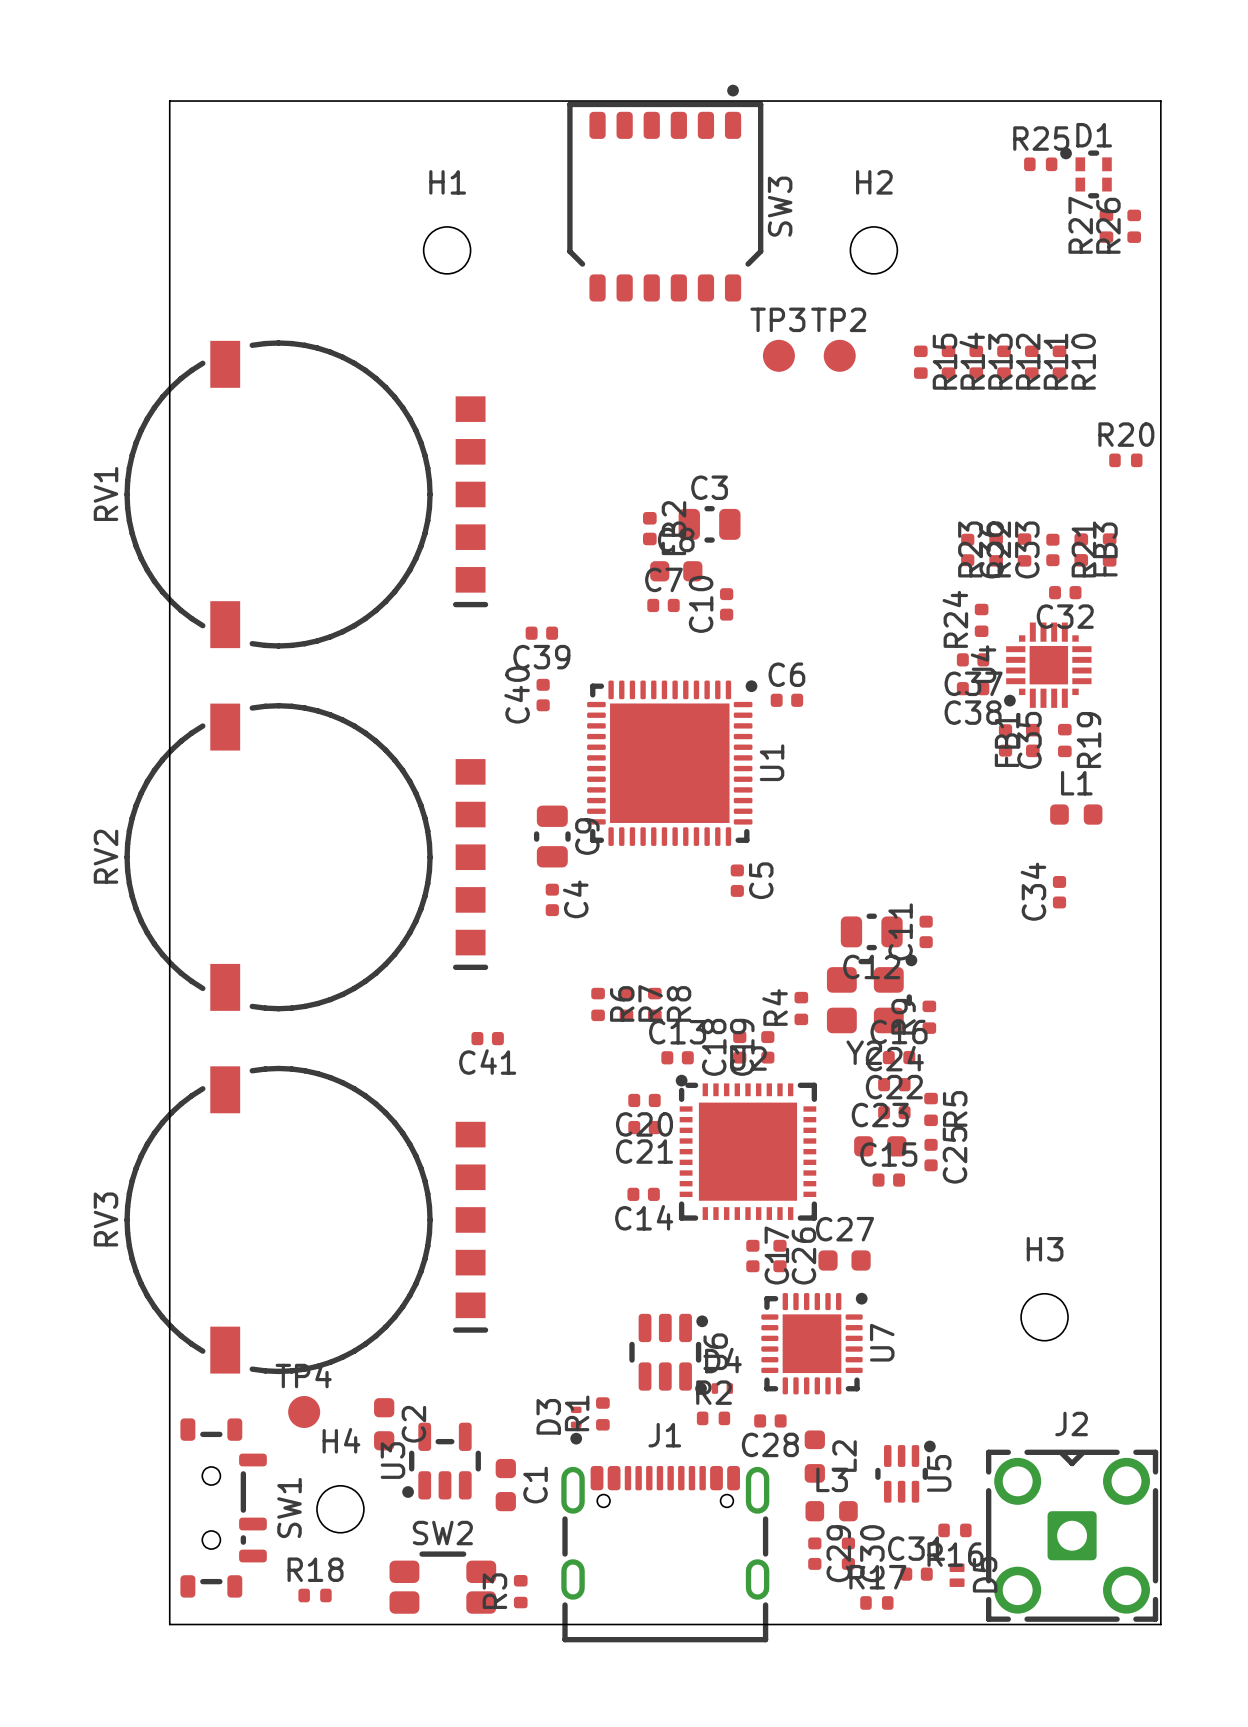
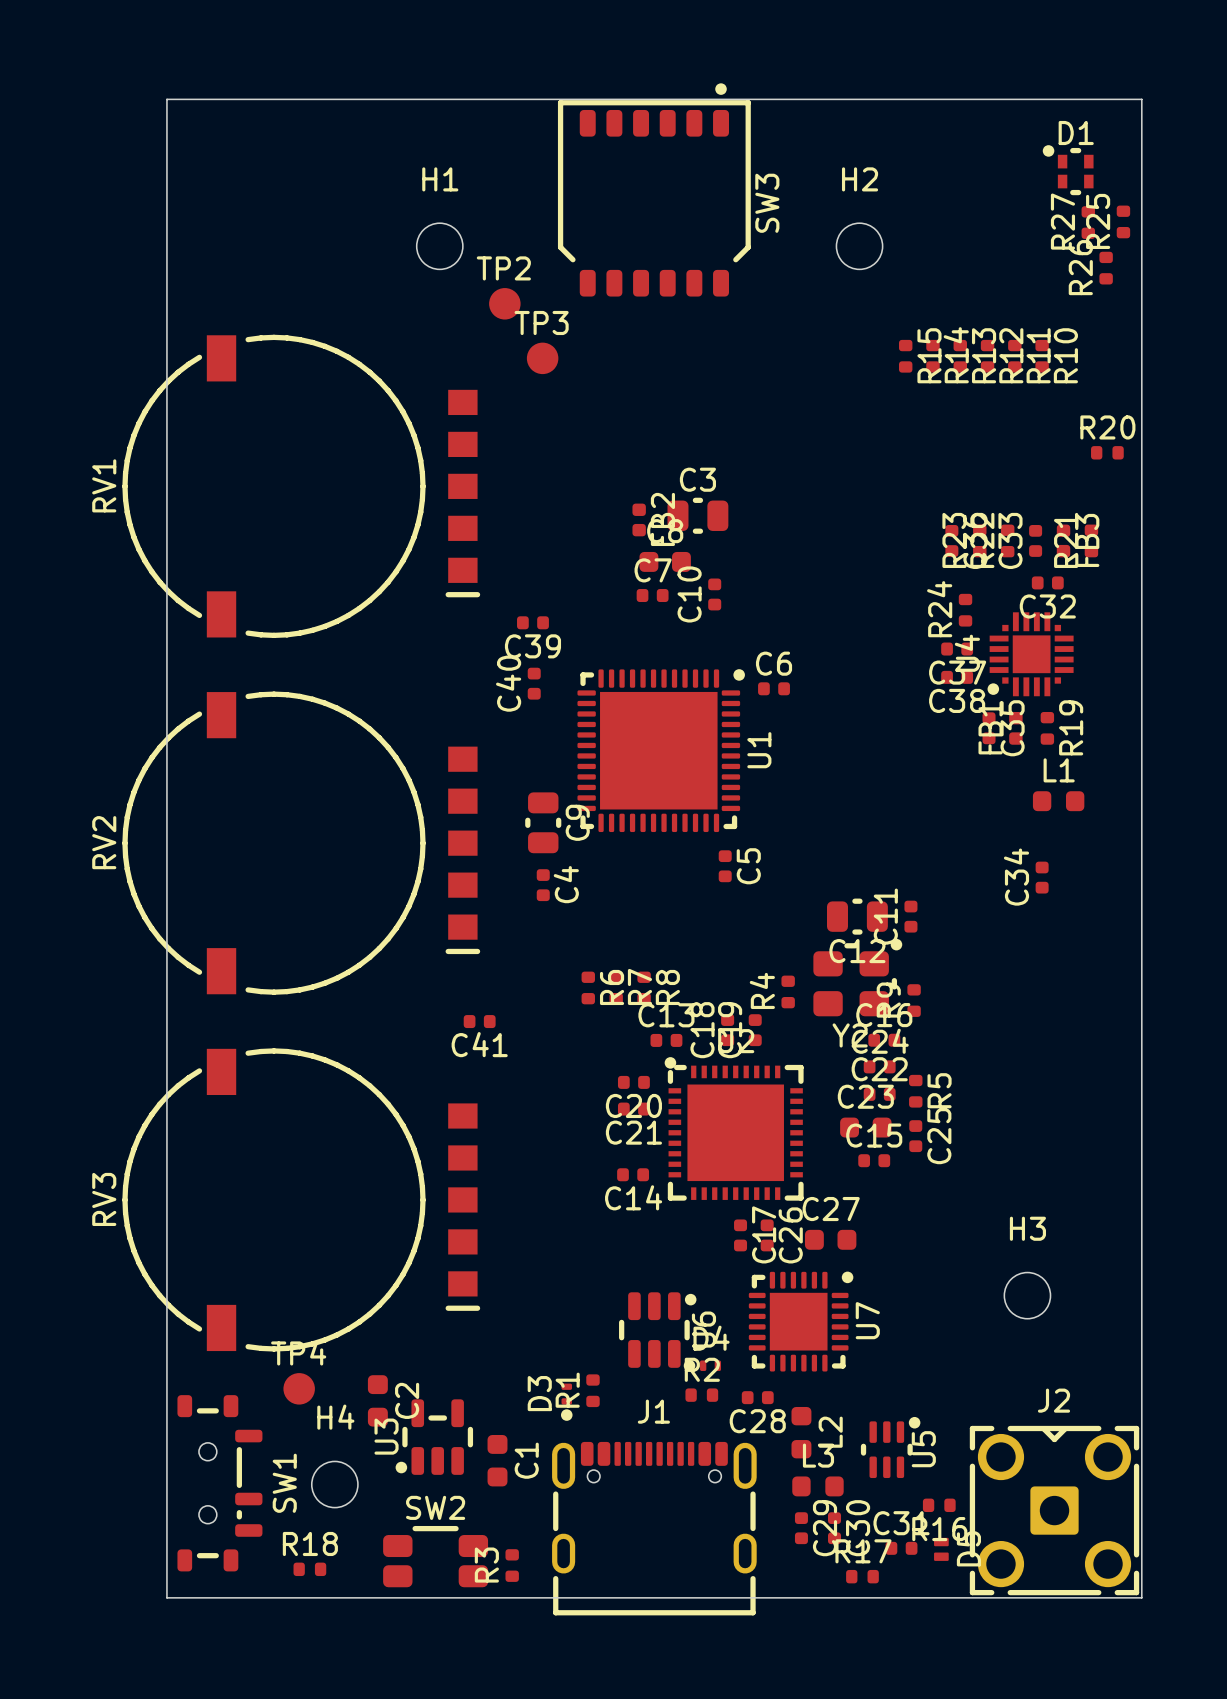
R25 rotation: 0° (1040, 164) -> 90° clockwise (1123, 221)
R25 position: (1040, 164) -> (1123, 221)
R26 position: (1134, 226) -> (1106, 268)
TP3 position: (778, 355) -> (542, 358)
TP2 position: (839, 355) -> (504, 303)

